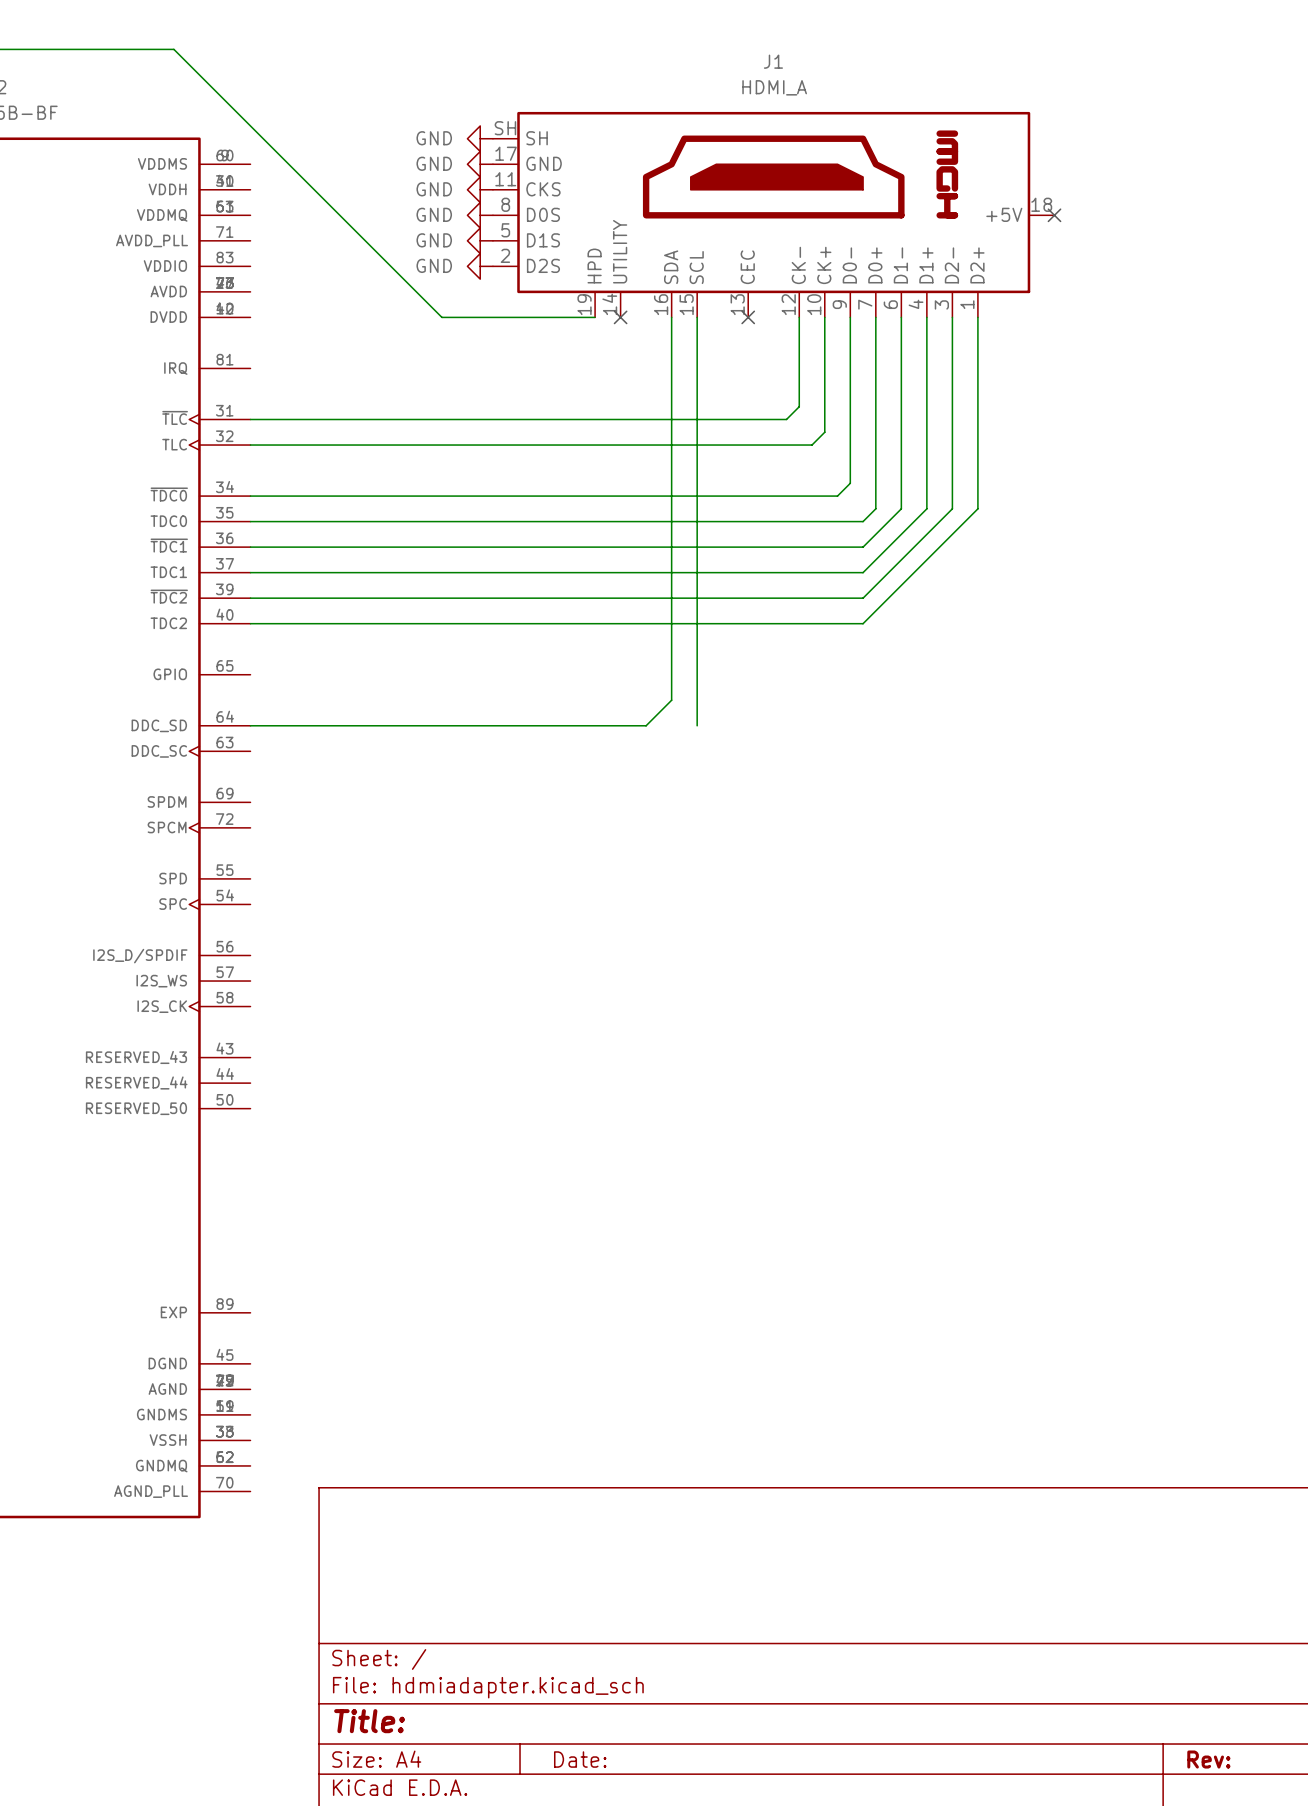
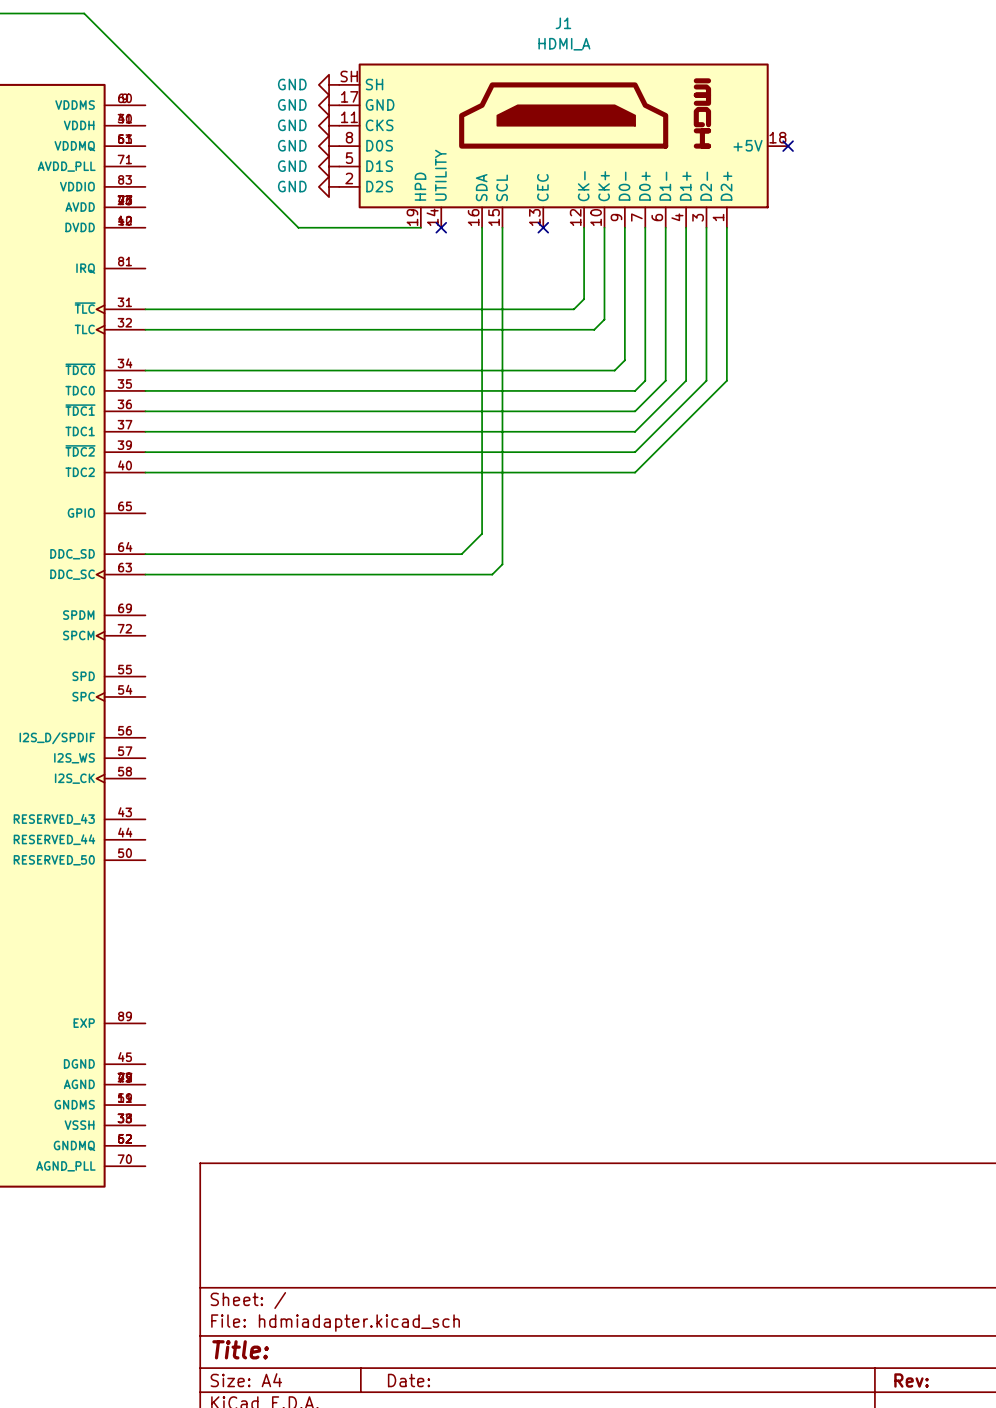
wire: none -> (502, 554) (502, 564) (492, 574) (145, 574)

